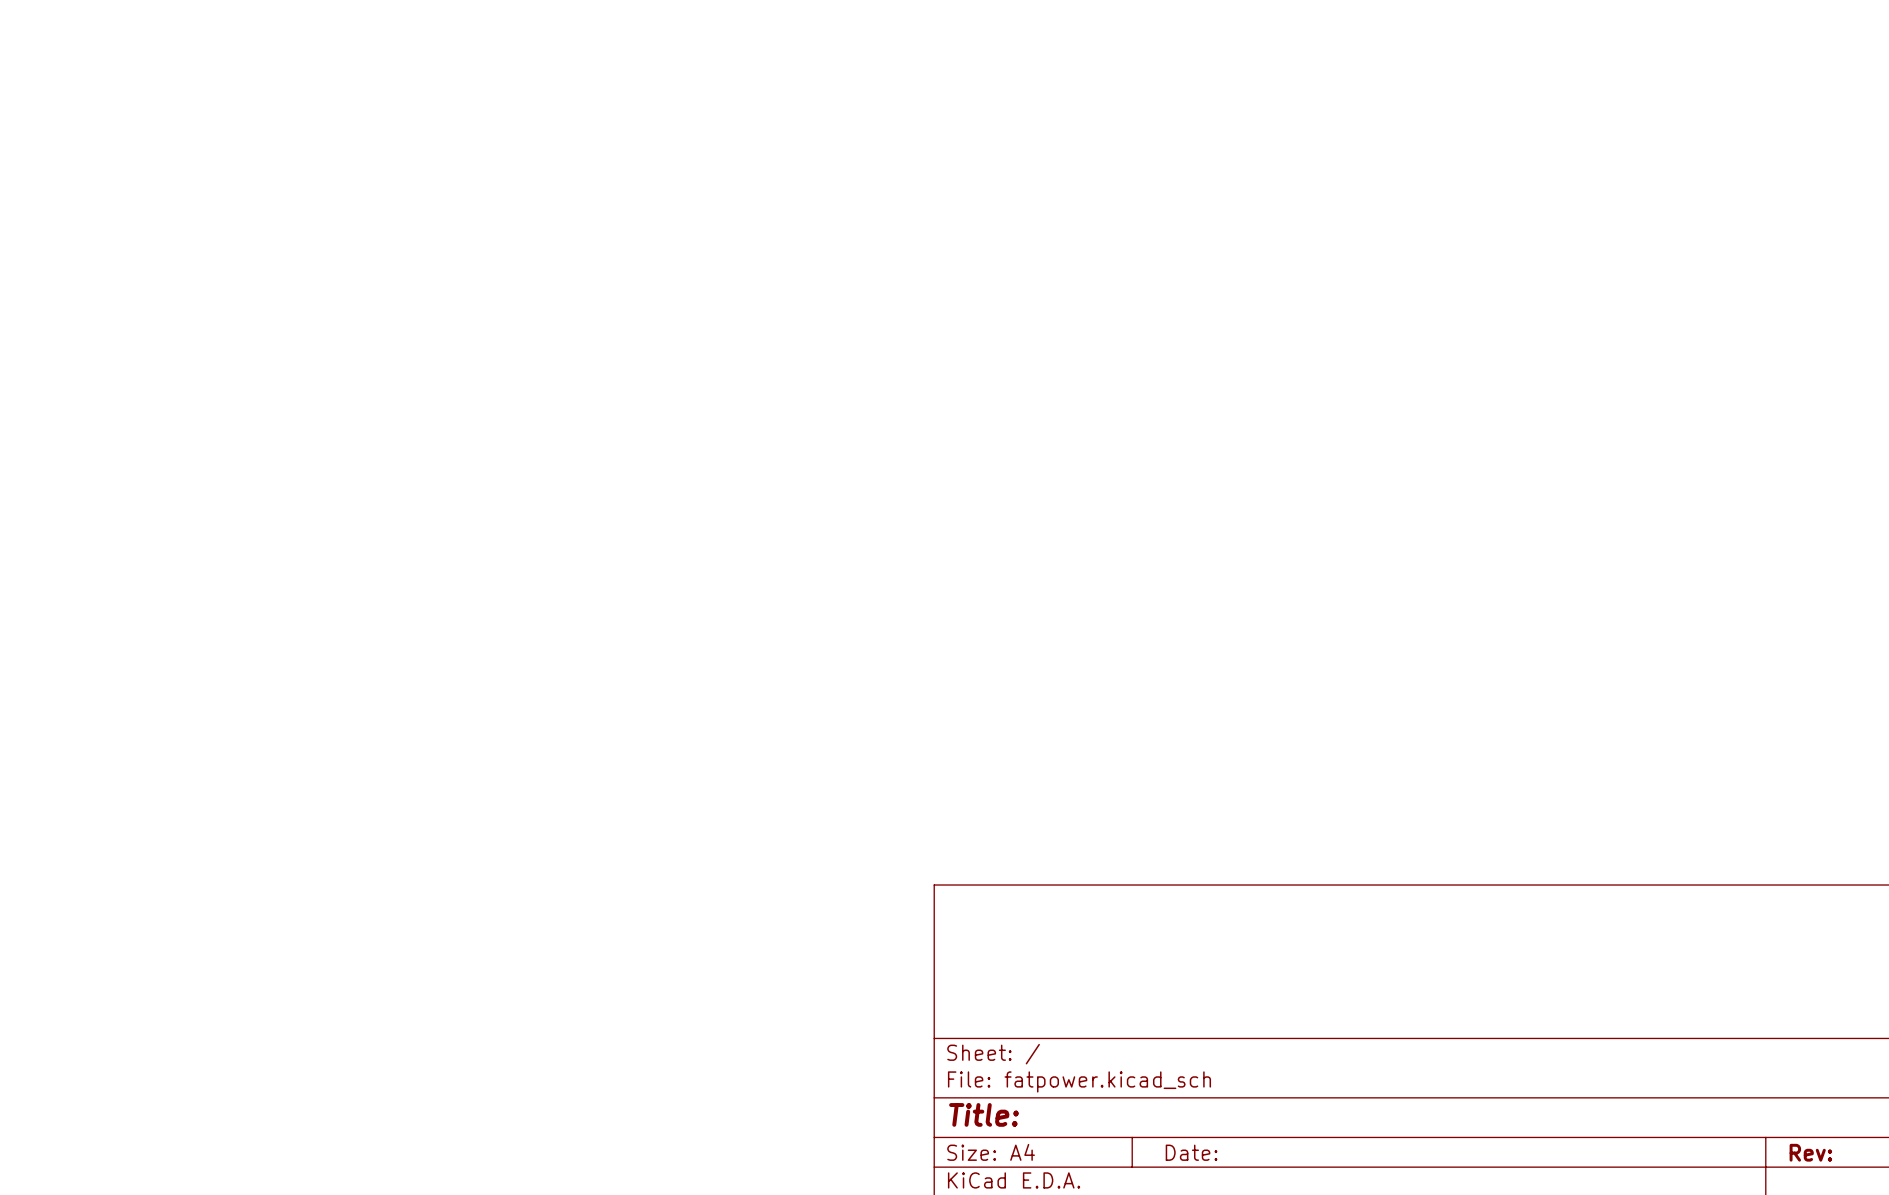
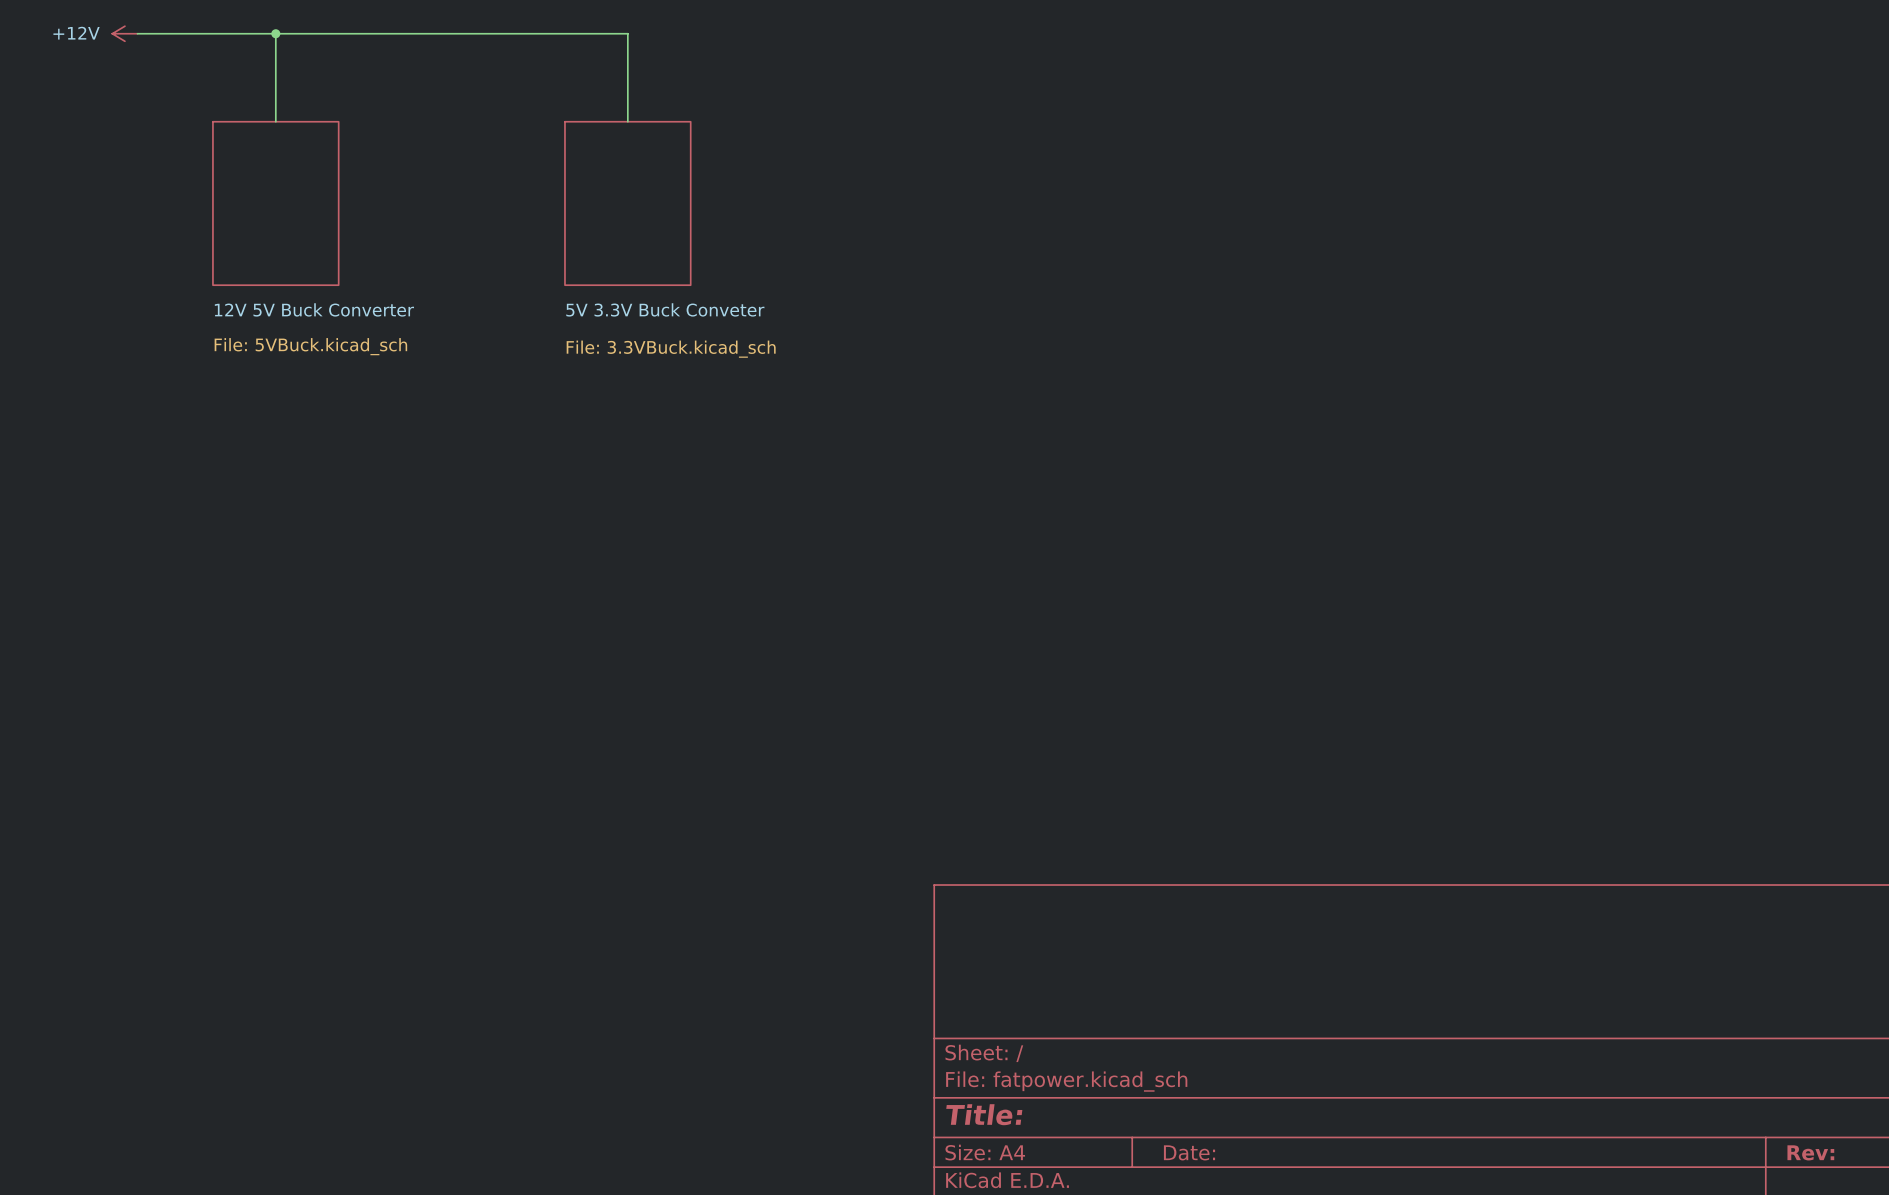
power symbol: none -> +12V (124, 33)
wire: none -> (137, 33) (627, 33) (627, 121)
wire: none -> (275, 33) (275, 121)
junction: none -> (275, 33)
sheet 12V 5V Buck Converter: none -> File: 5VBuck.kicad_sch (275, 203)
sheet 5V 3.3V Buck Conveter: none -> File: 3.3VBuck.kicad_sch (627, 203)

